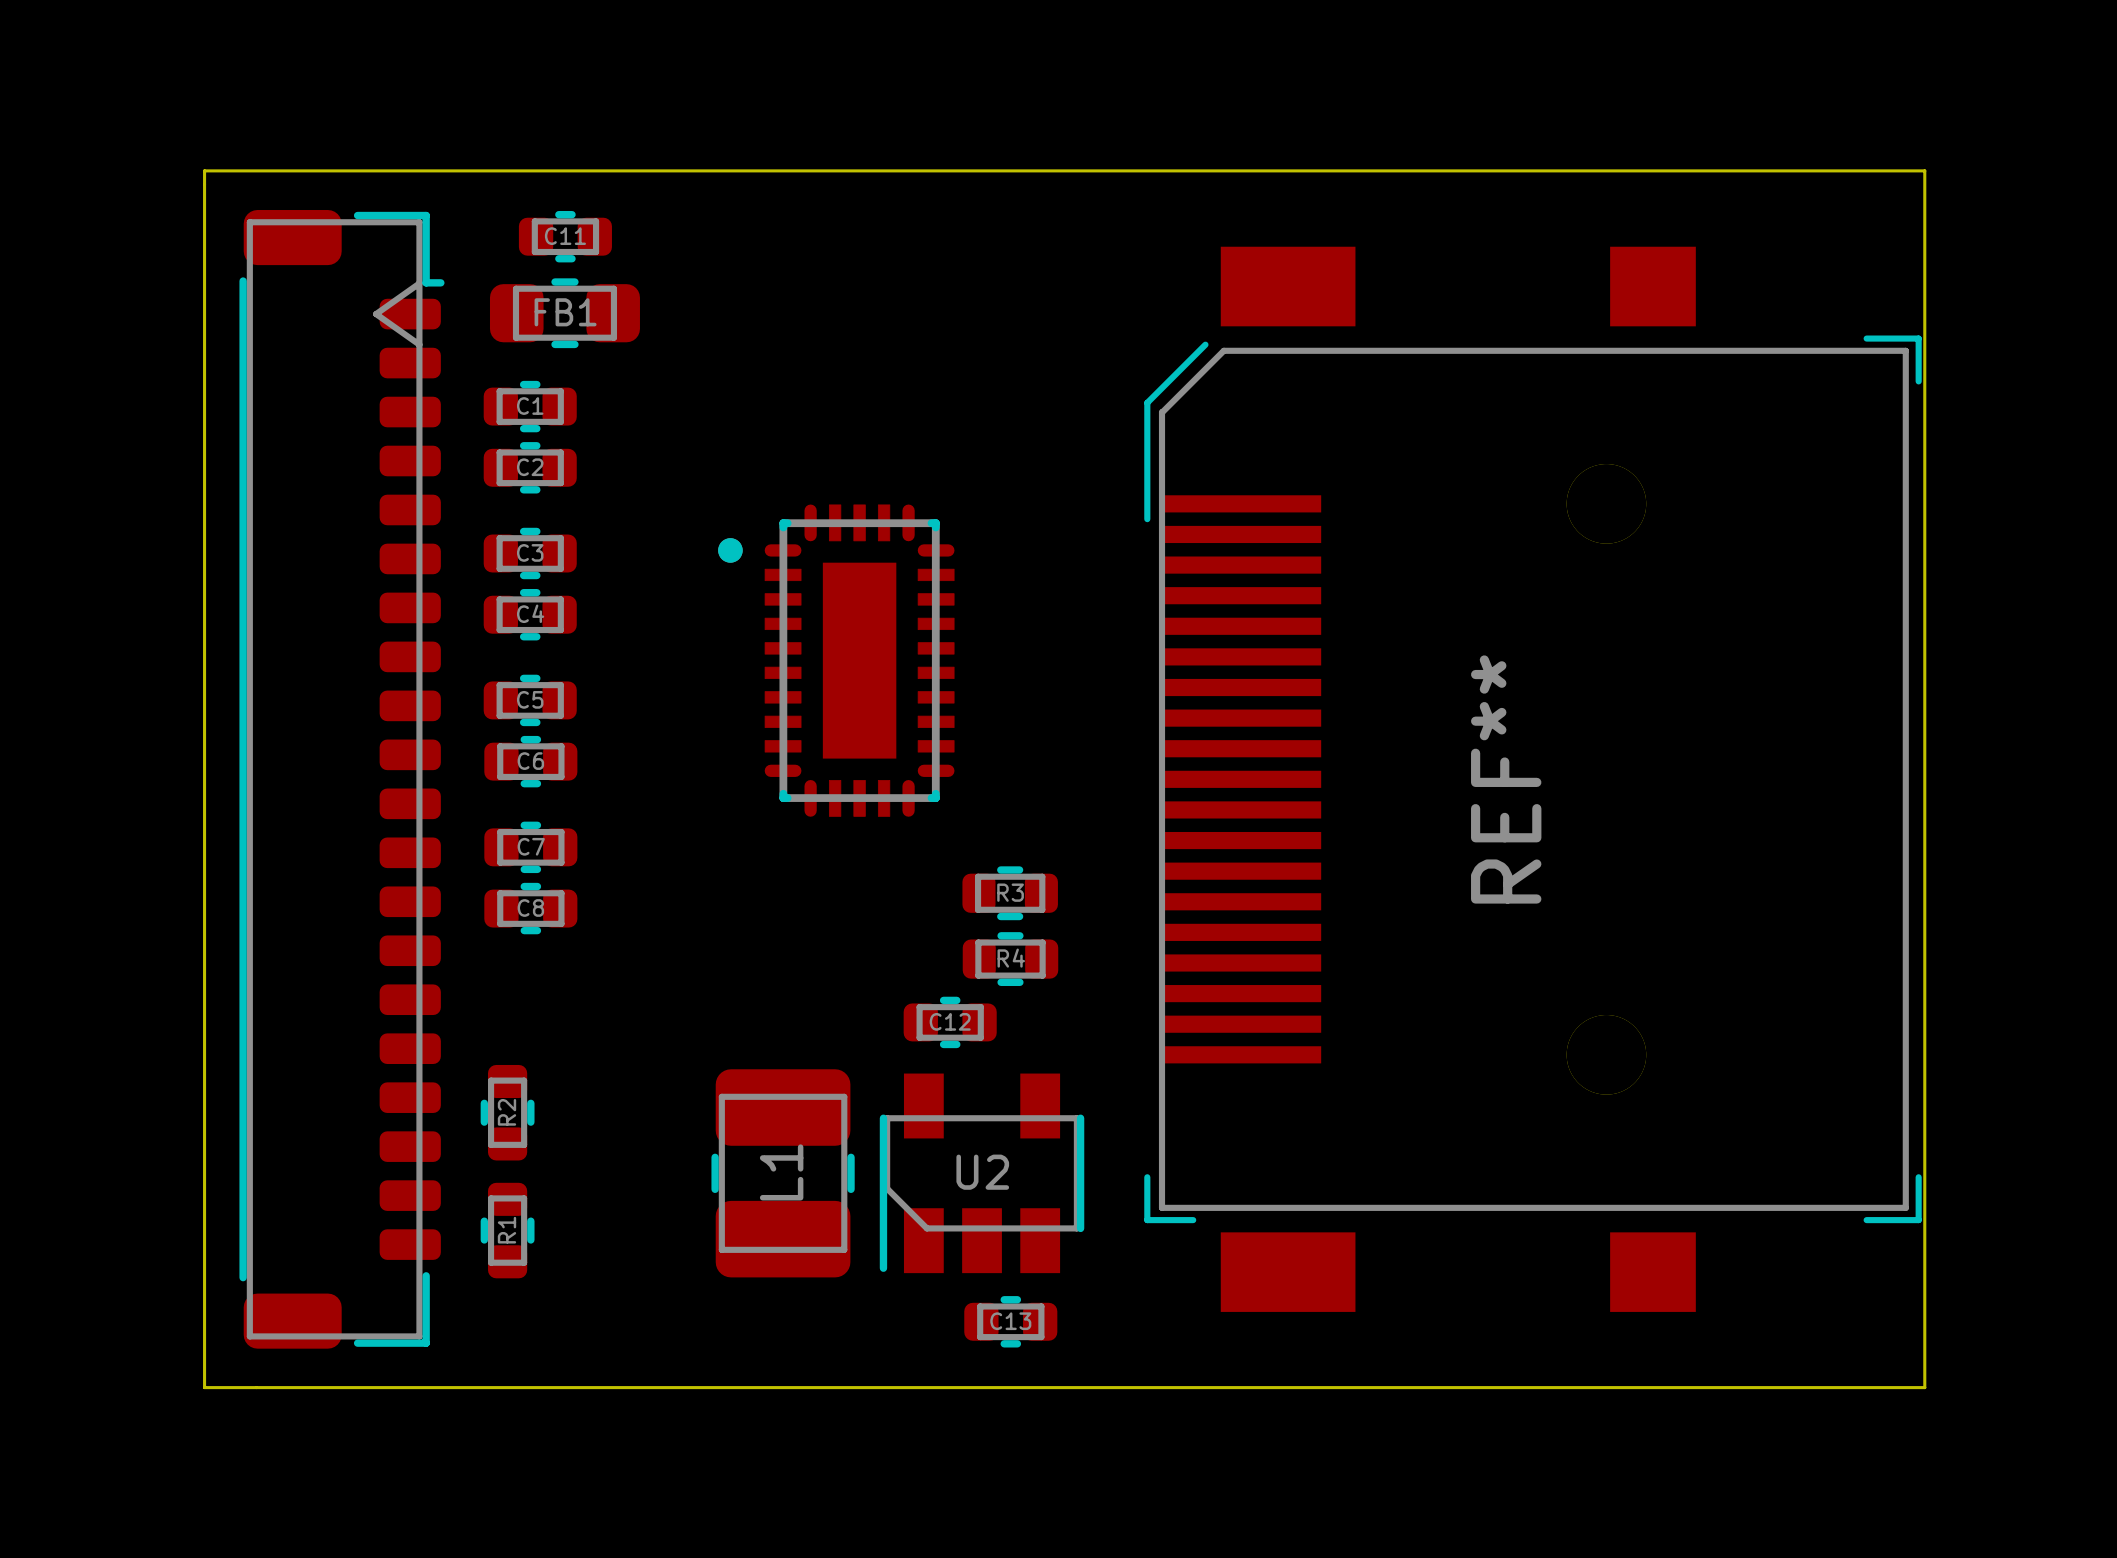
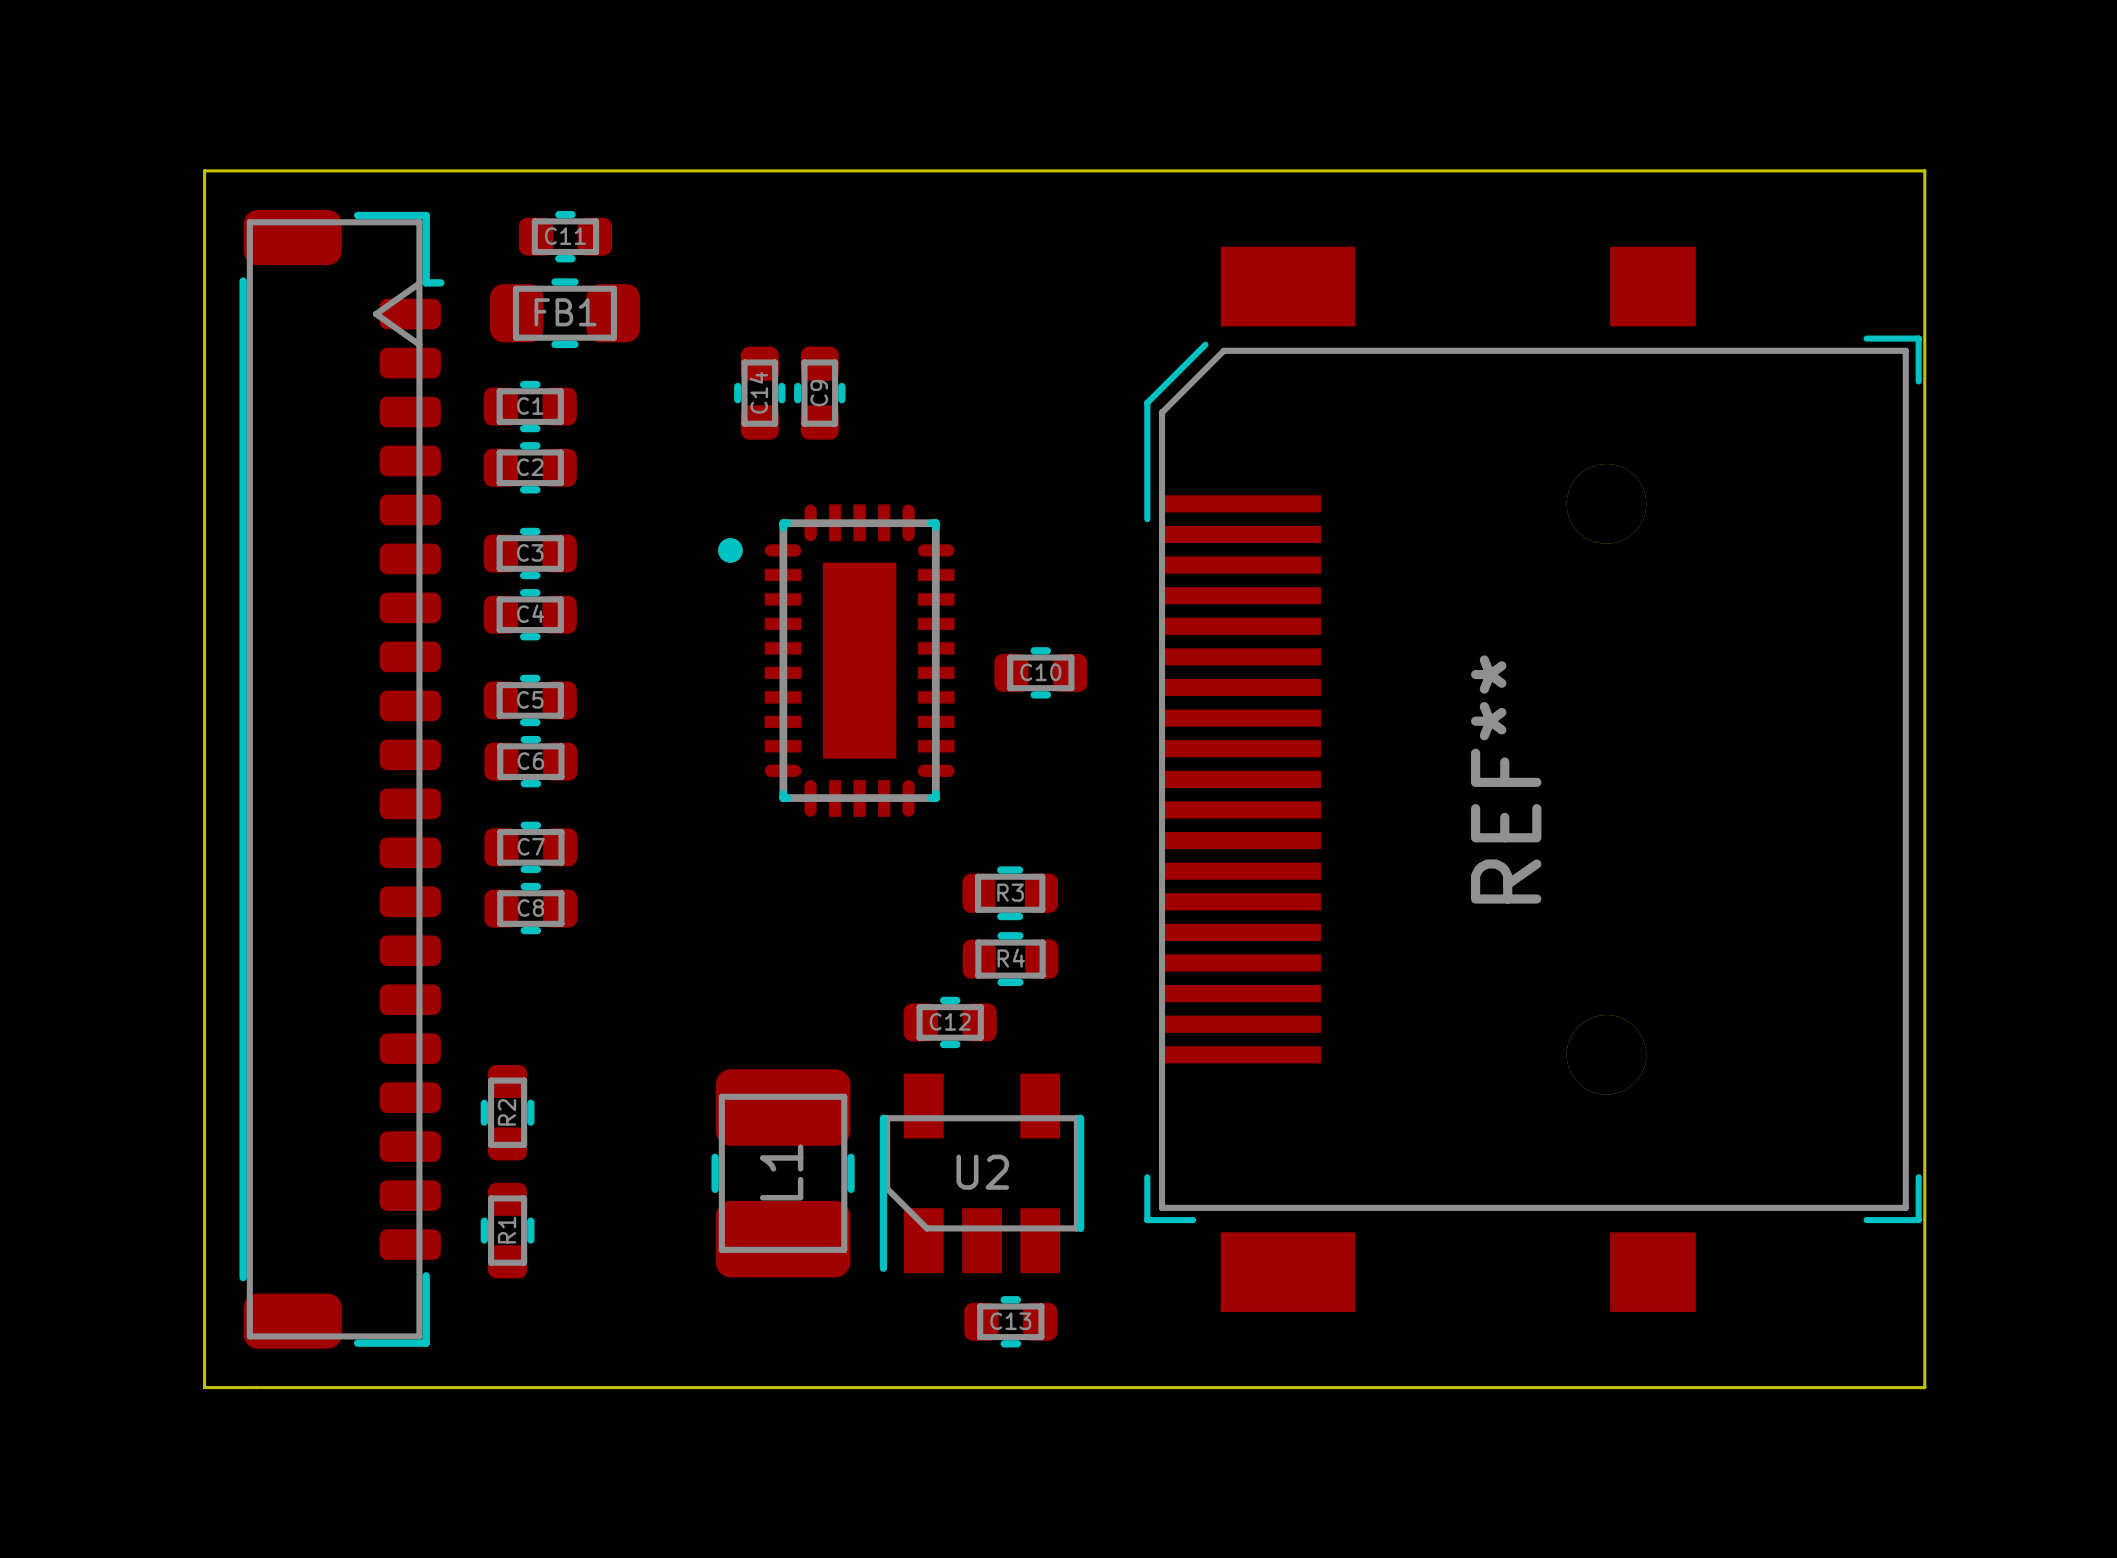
C14: none -> (759, 393)
C9: none -> (819, 393)
C10: none -> (1040, 672)

